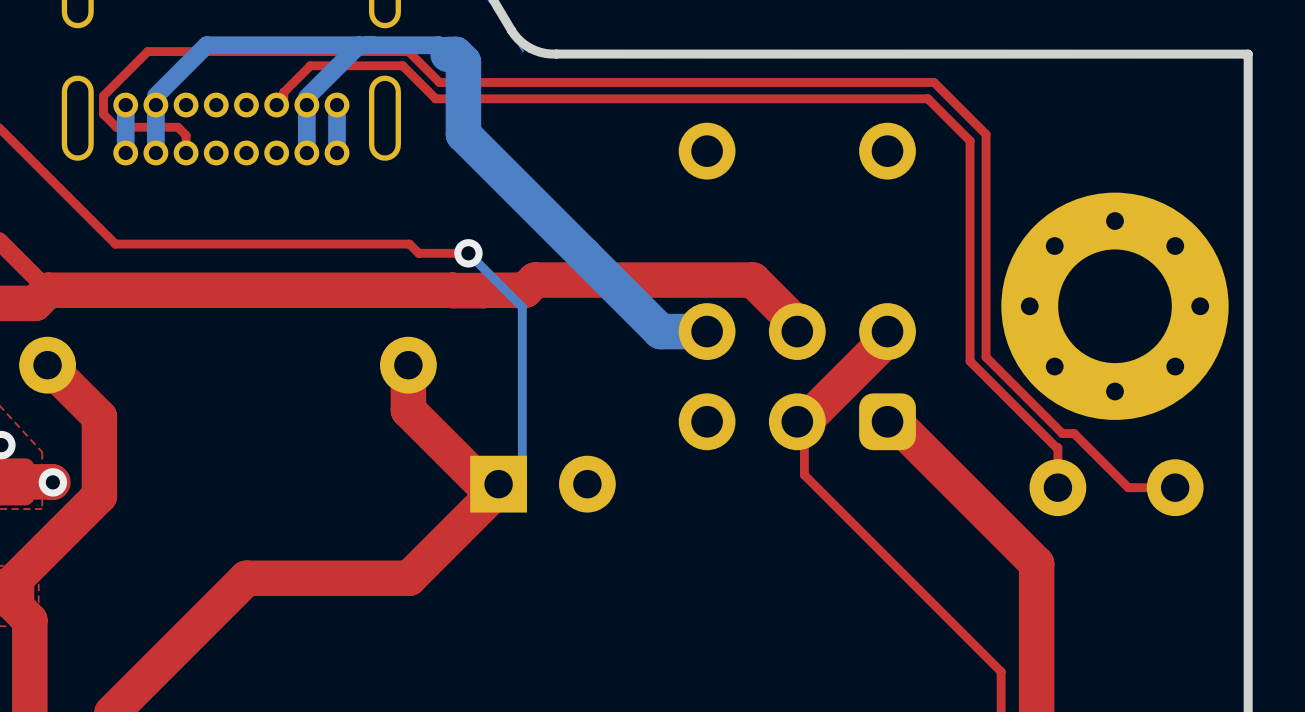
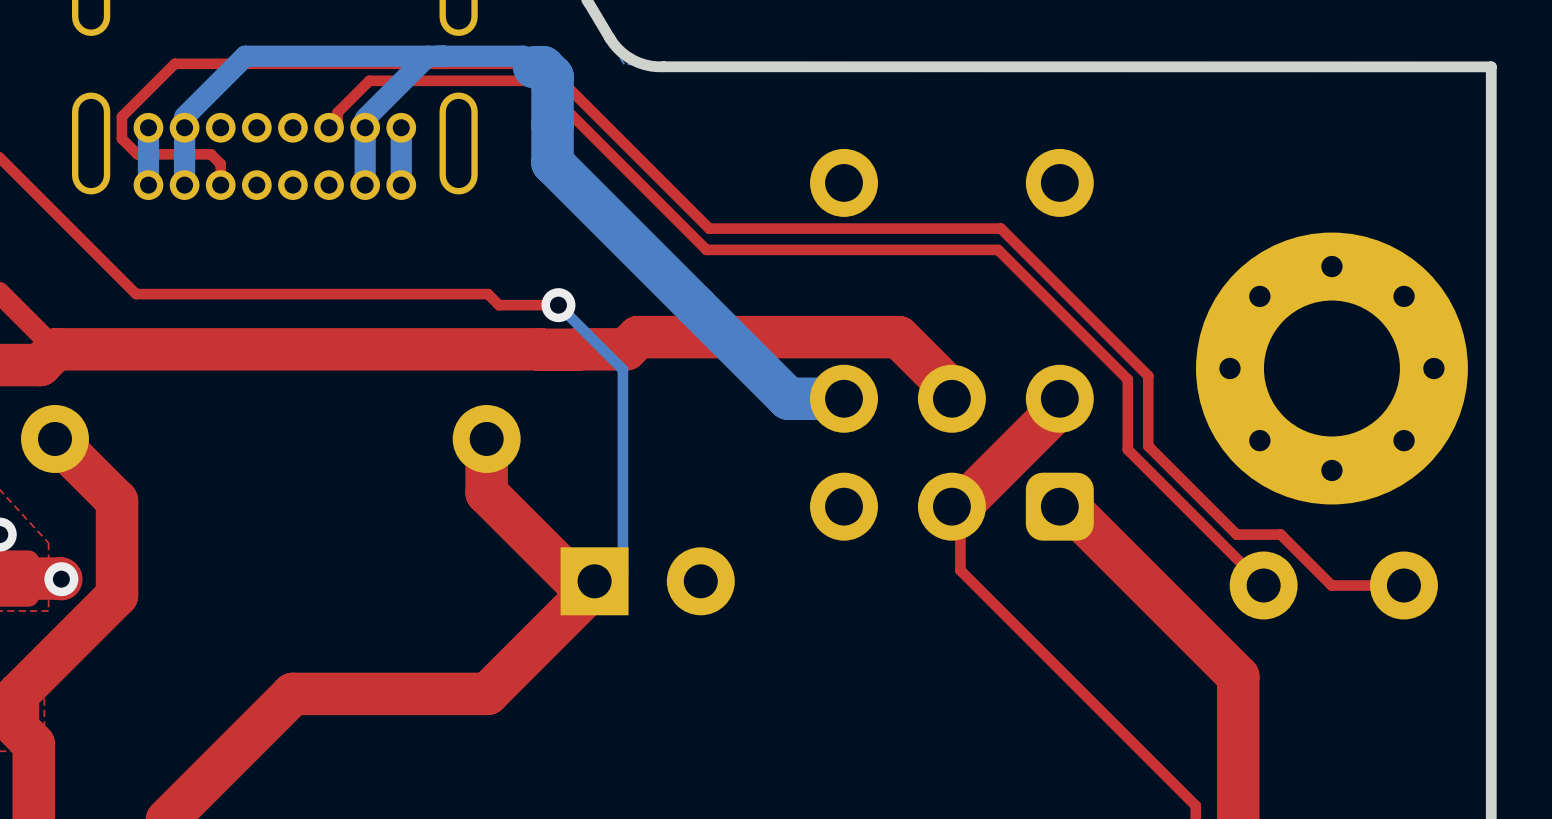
top track: (408, 51) (439, 82) (934, 82) (986, 134) (986, 357) (1062, 433) (1074, 433) (1128, 487) -> (486, 63) (544, 63) (709, 228) (1000, 228) (1148, 375) (1148, 446) (1236, 534) (1280, 534) (1331, 585) (1347, 585)
top track: (402, 65) (435, 98) (927, 98) (970, 140) (970, 361) (1057, 447) (1057, 487) -> (479, 80) (537, 80) (706, 249) (998, 249) (1127, 379) (1127, 449) (1263, 585)

